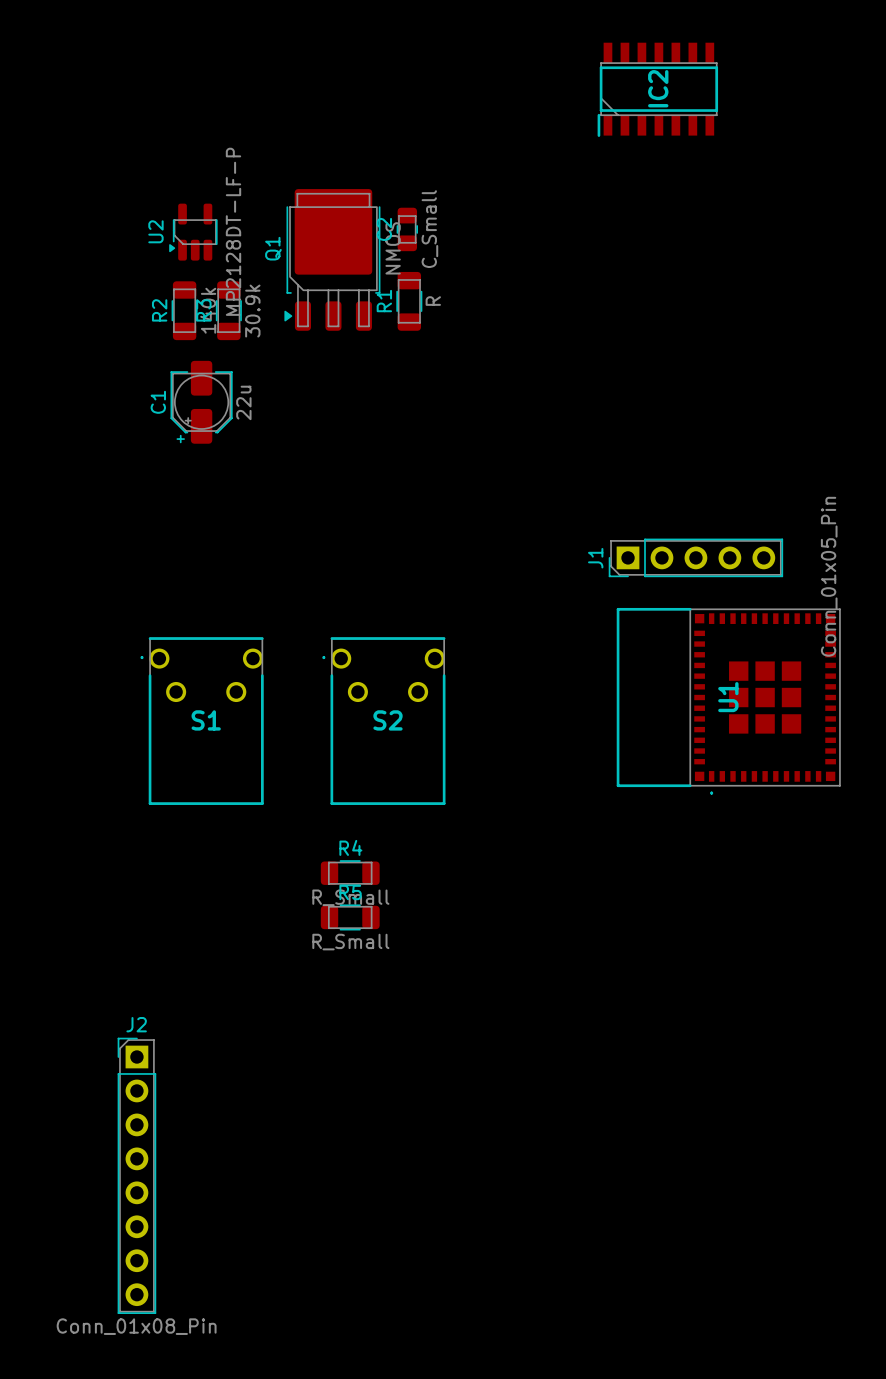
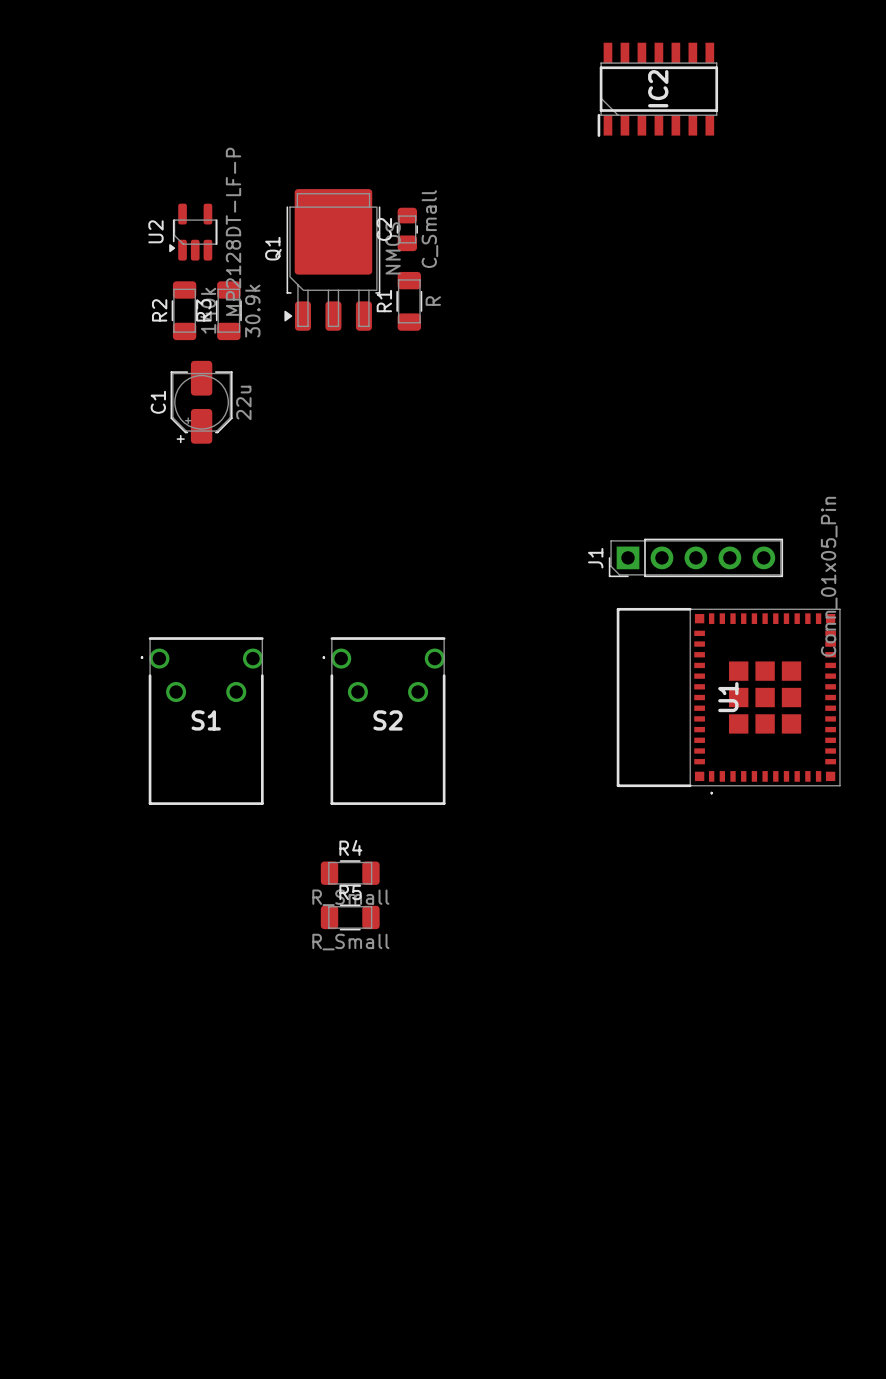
J2: Conn_01x08_Pin (136, 1175) -> none

